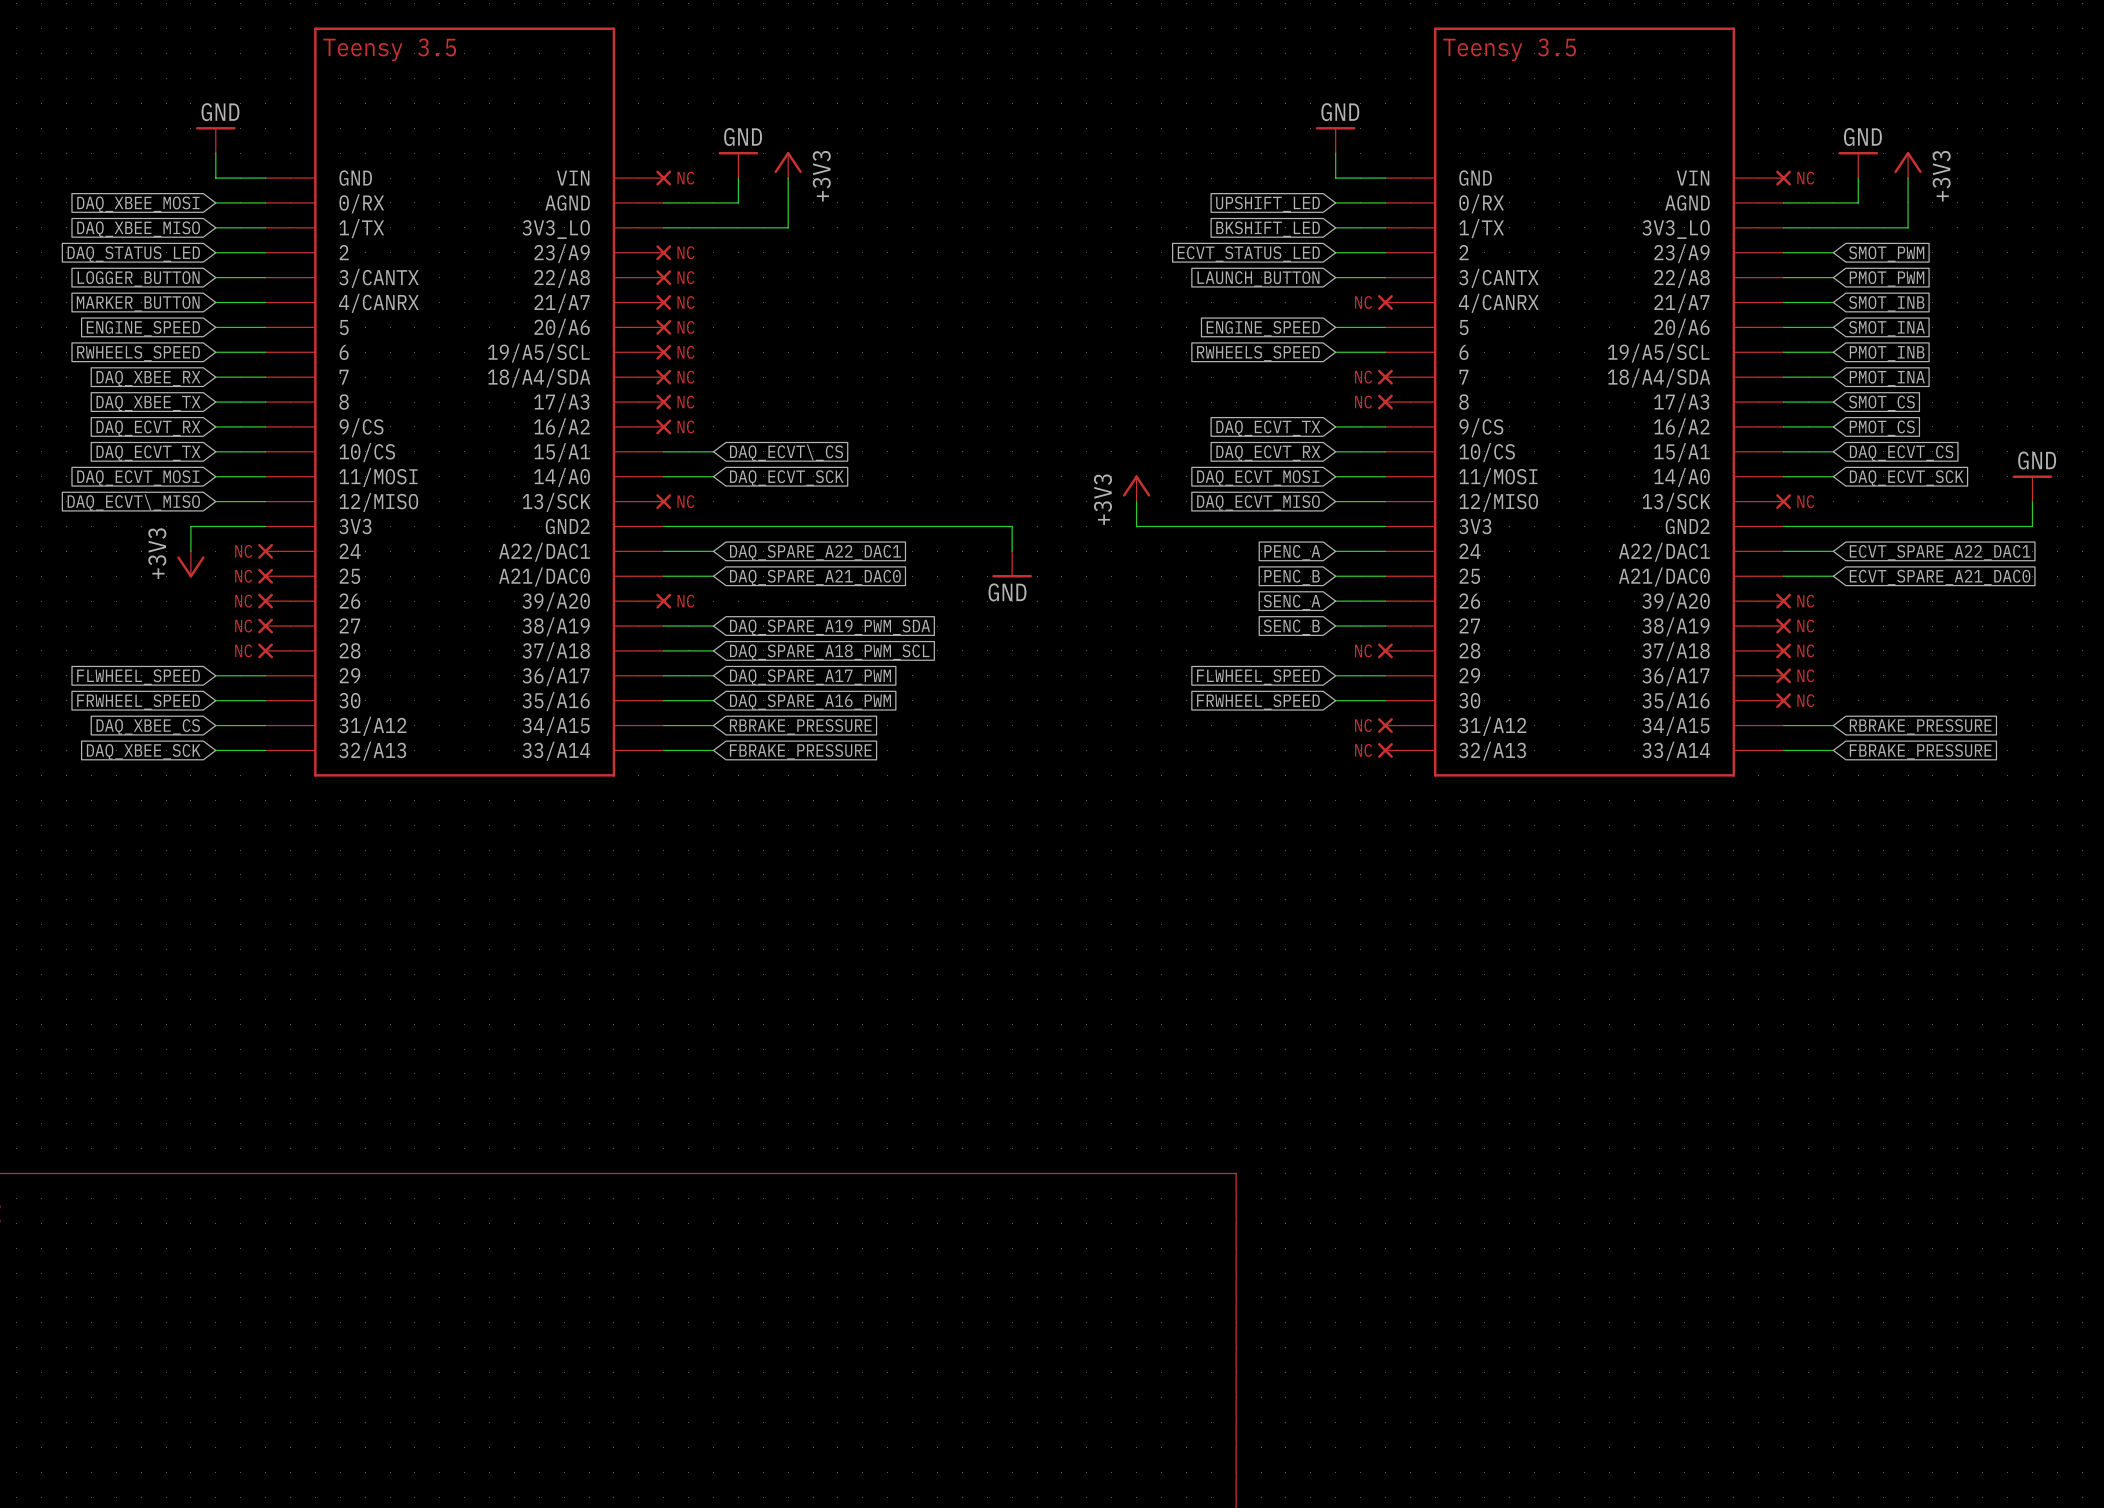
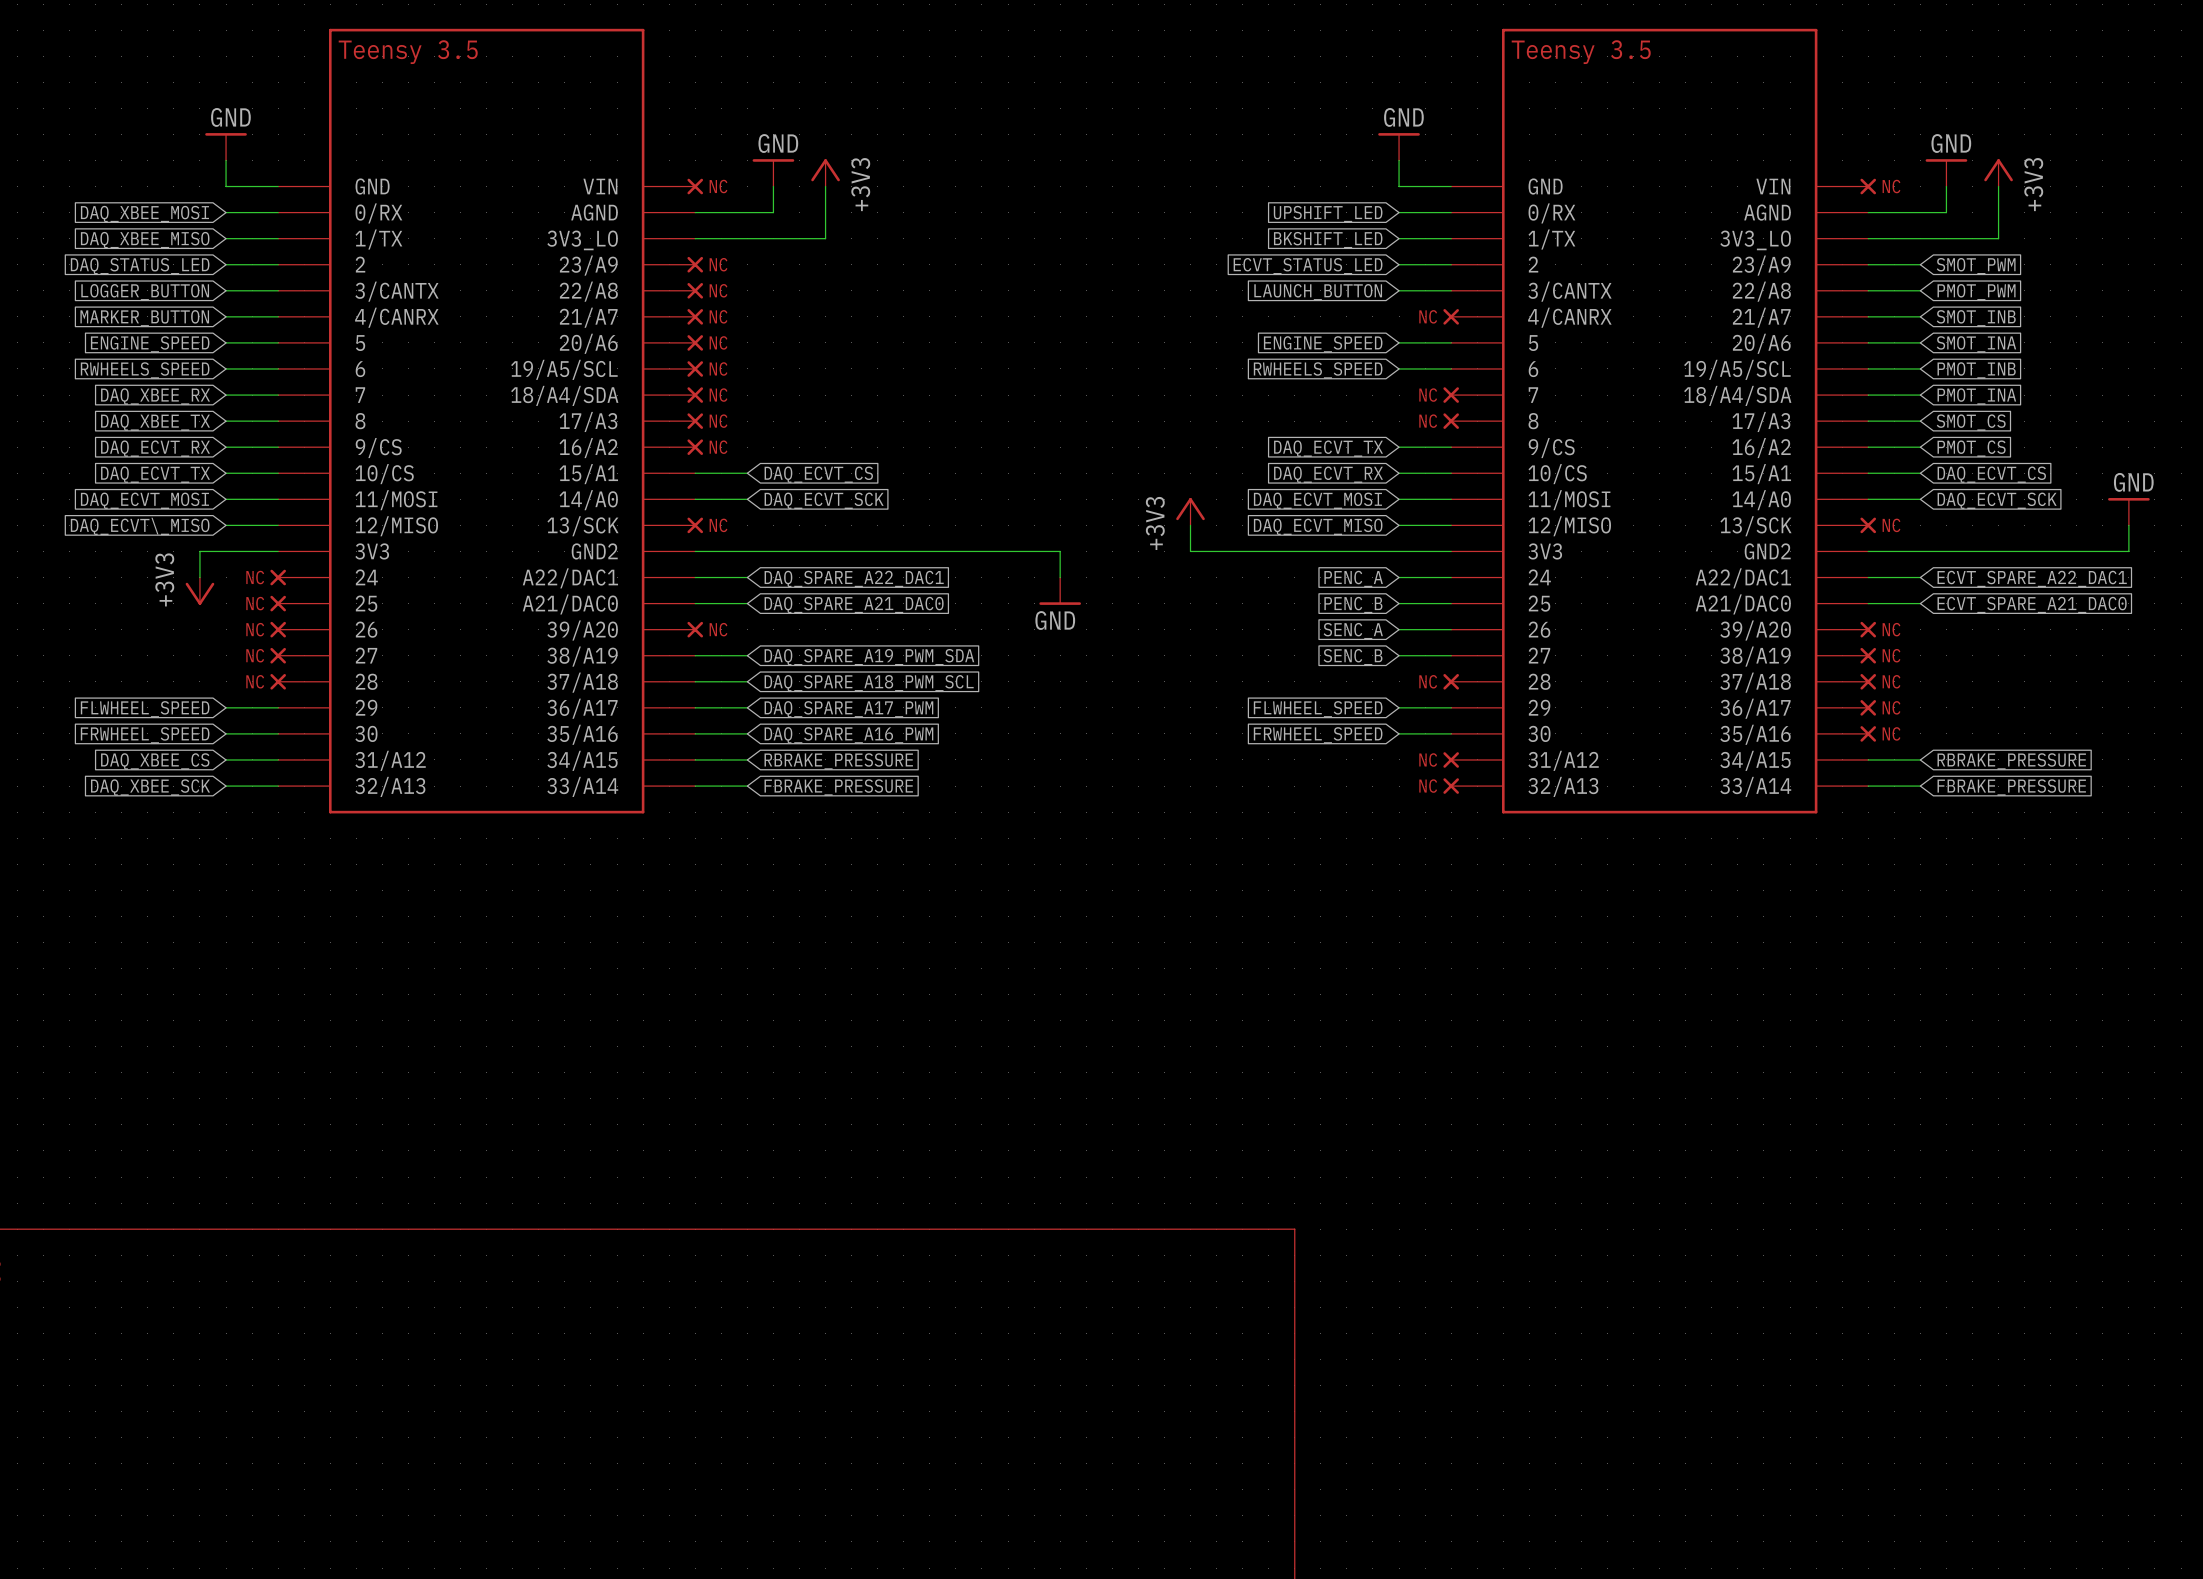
global label: DAQ_ECVT\_CS (786, 452) -> DAQ_ECVT_CS (818, 474)

